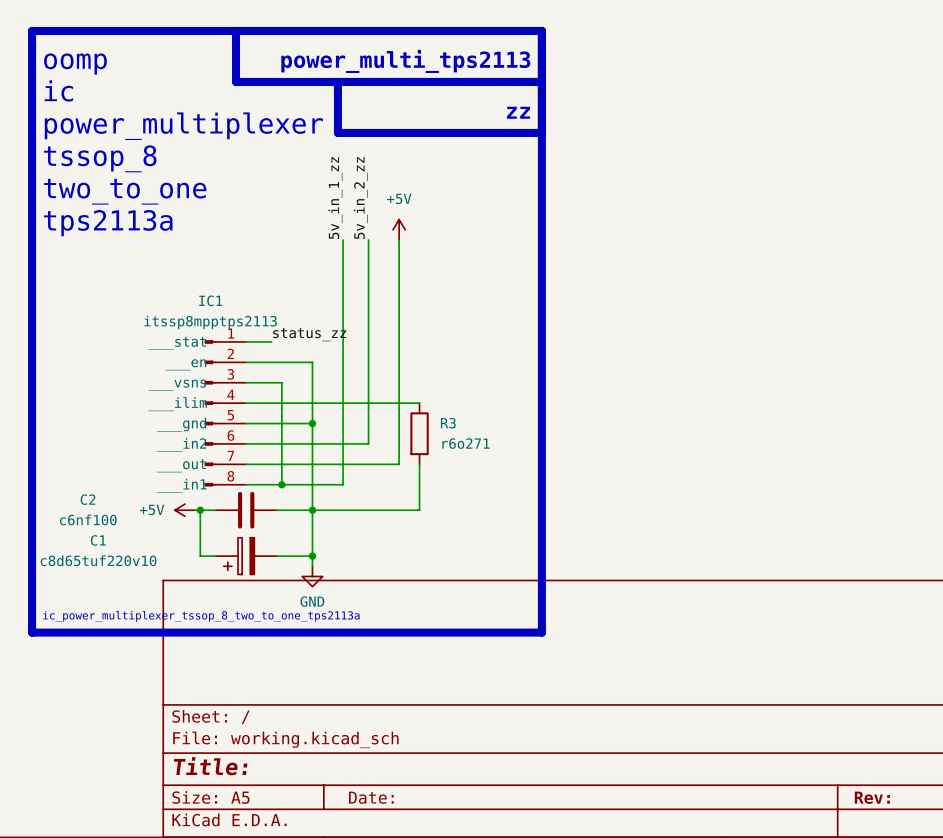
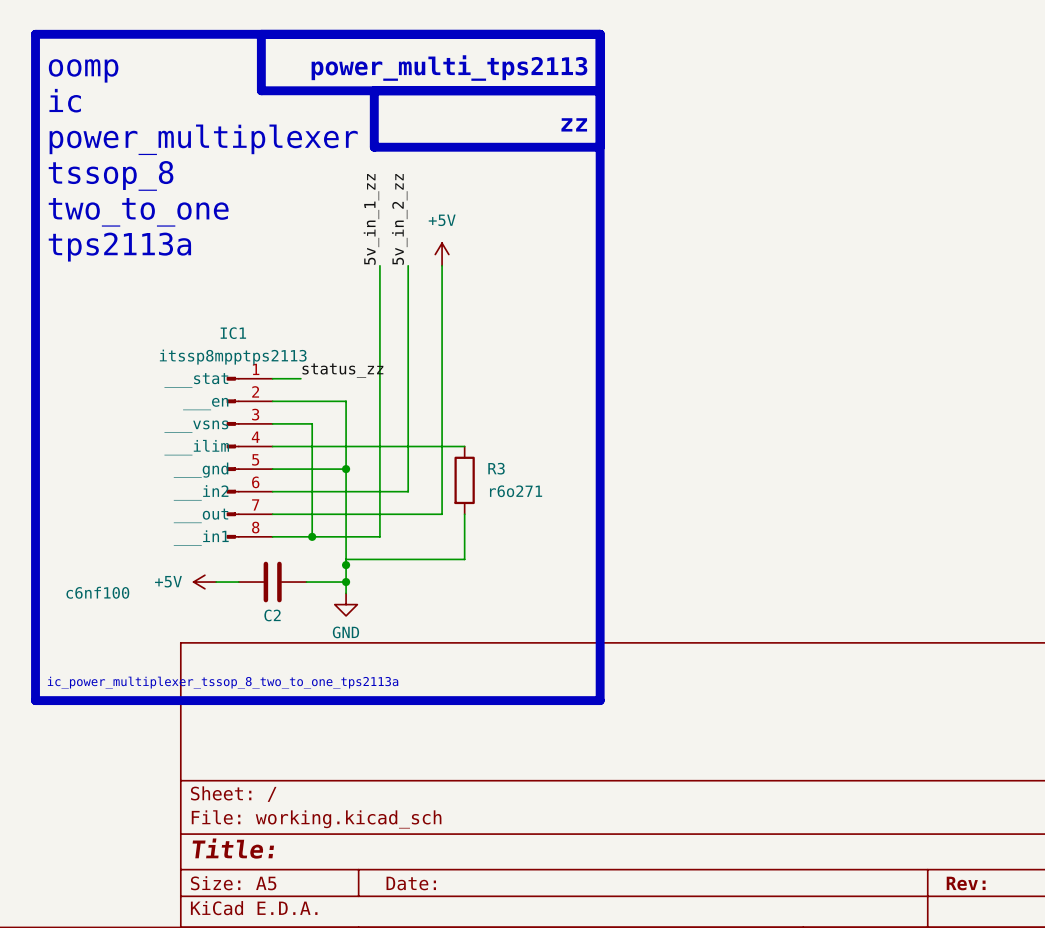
C2 name position: C2 (88, 499) -> C2 (272, 615)
wire: (419, 505) (419, 510) (276, 510) -> (464, 559) (346, 559)
power symbol position: +5V (185, 510) -> +5V (204, 582)
wire: (195, 510) (215, 510) -> (216, 582) (238, 582)
wire: (200, 510) (200, 556) (215, 556) -> none
junction: (200, 510) -> none
C2 position: (246, 510) -> (272, 582)
wire: (312, 535) (312, 566) -> none
C1: c8d65tuf220v10 (246, 556) -> none
wire: (276, 556) (312, 556) -> (306, 582) (346, 582)
junction position: (312, 556) -> (346, 582)
power symbol position: GND (312, 576) -> GND (346, 604)

